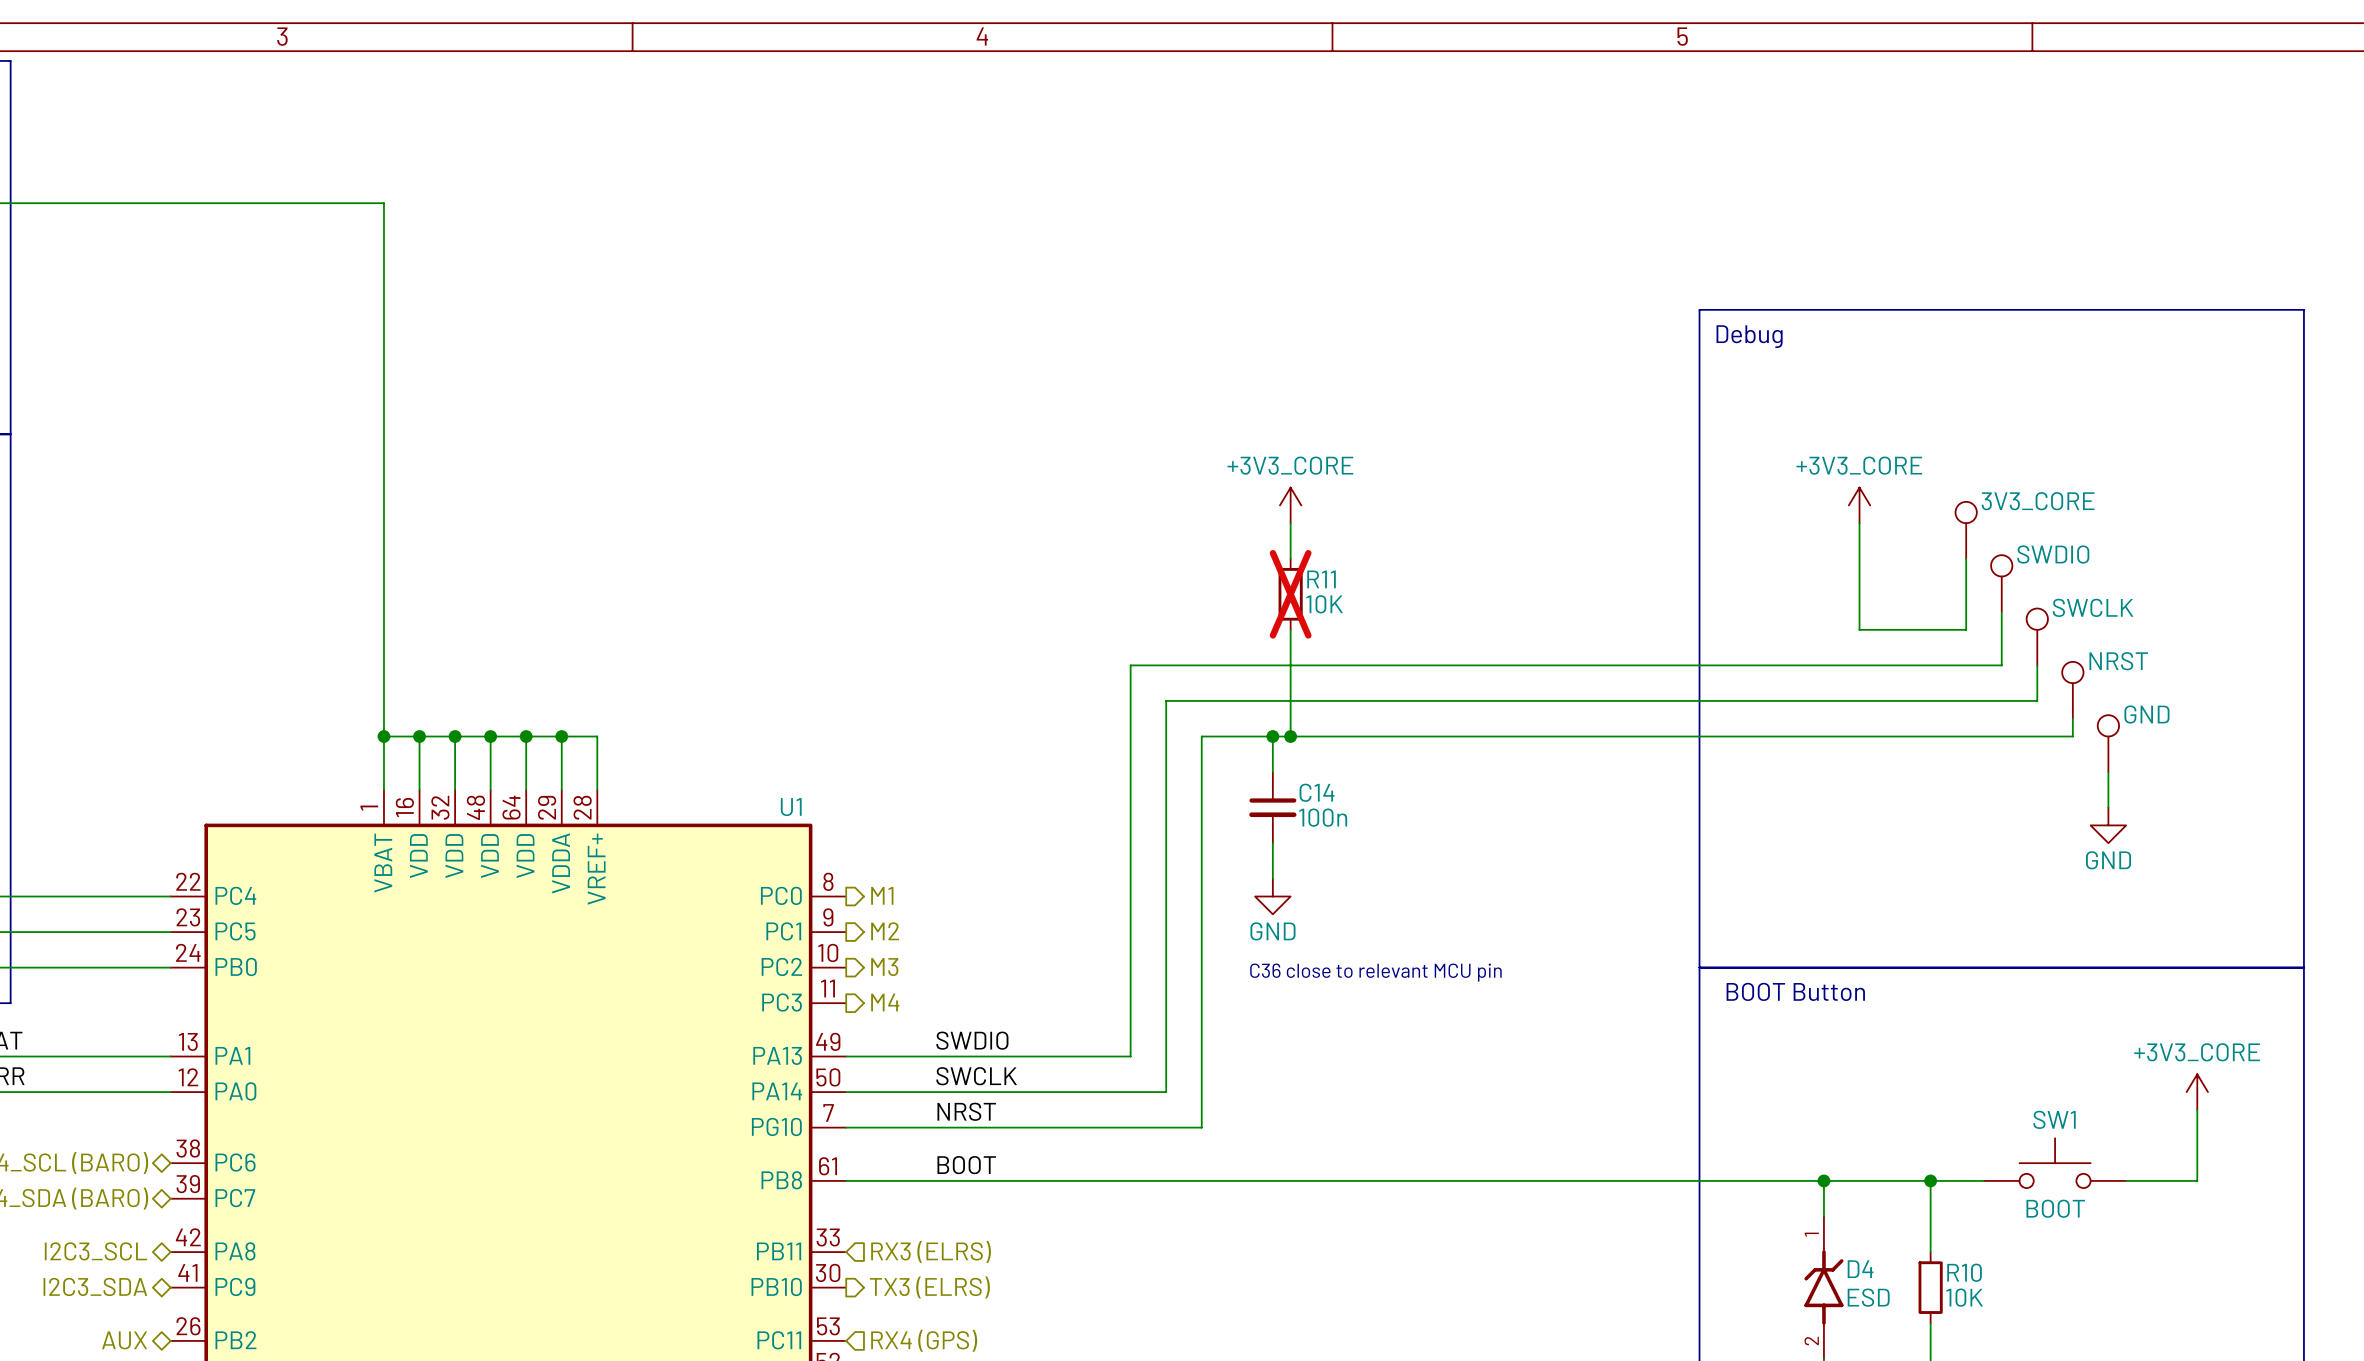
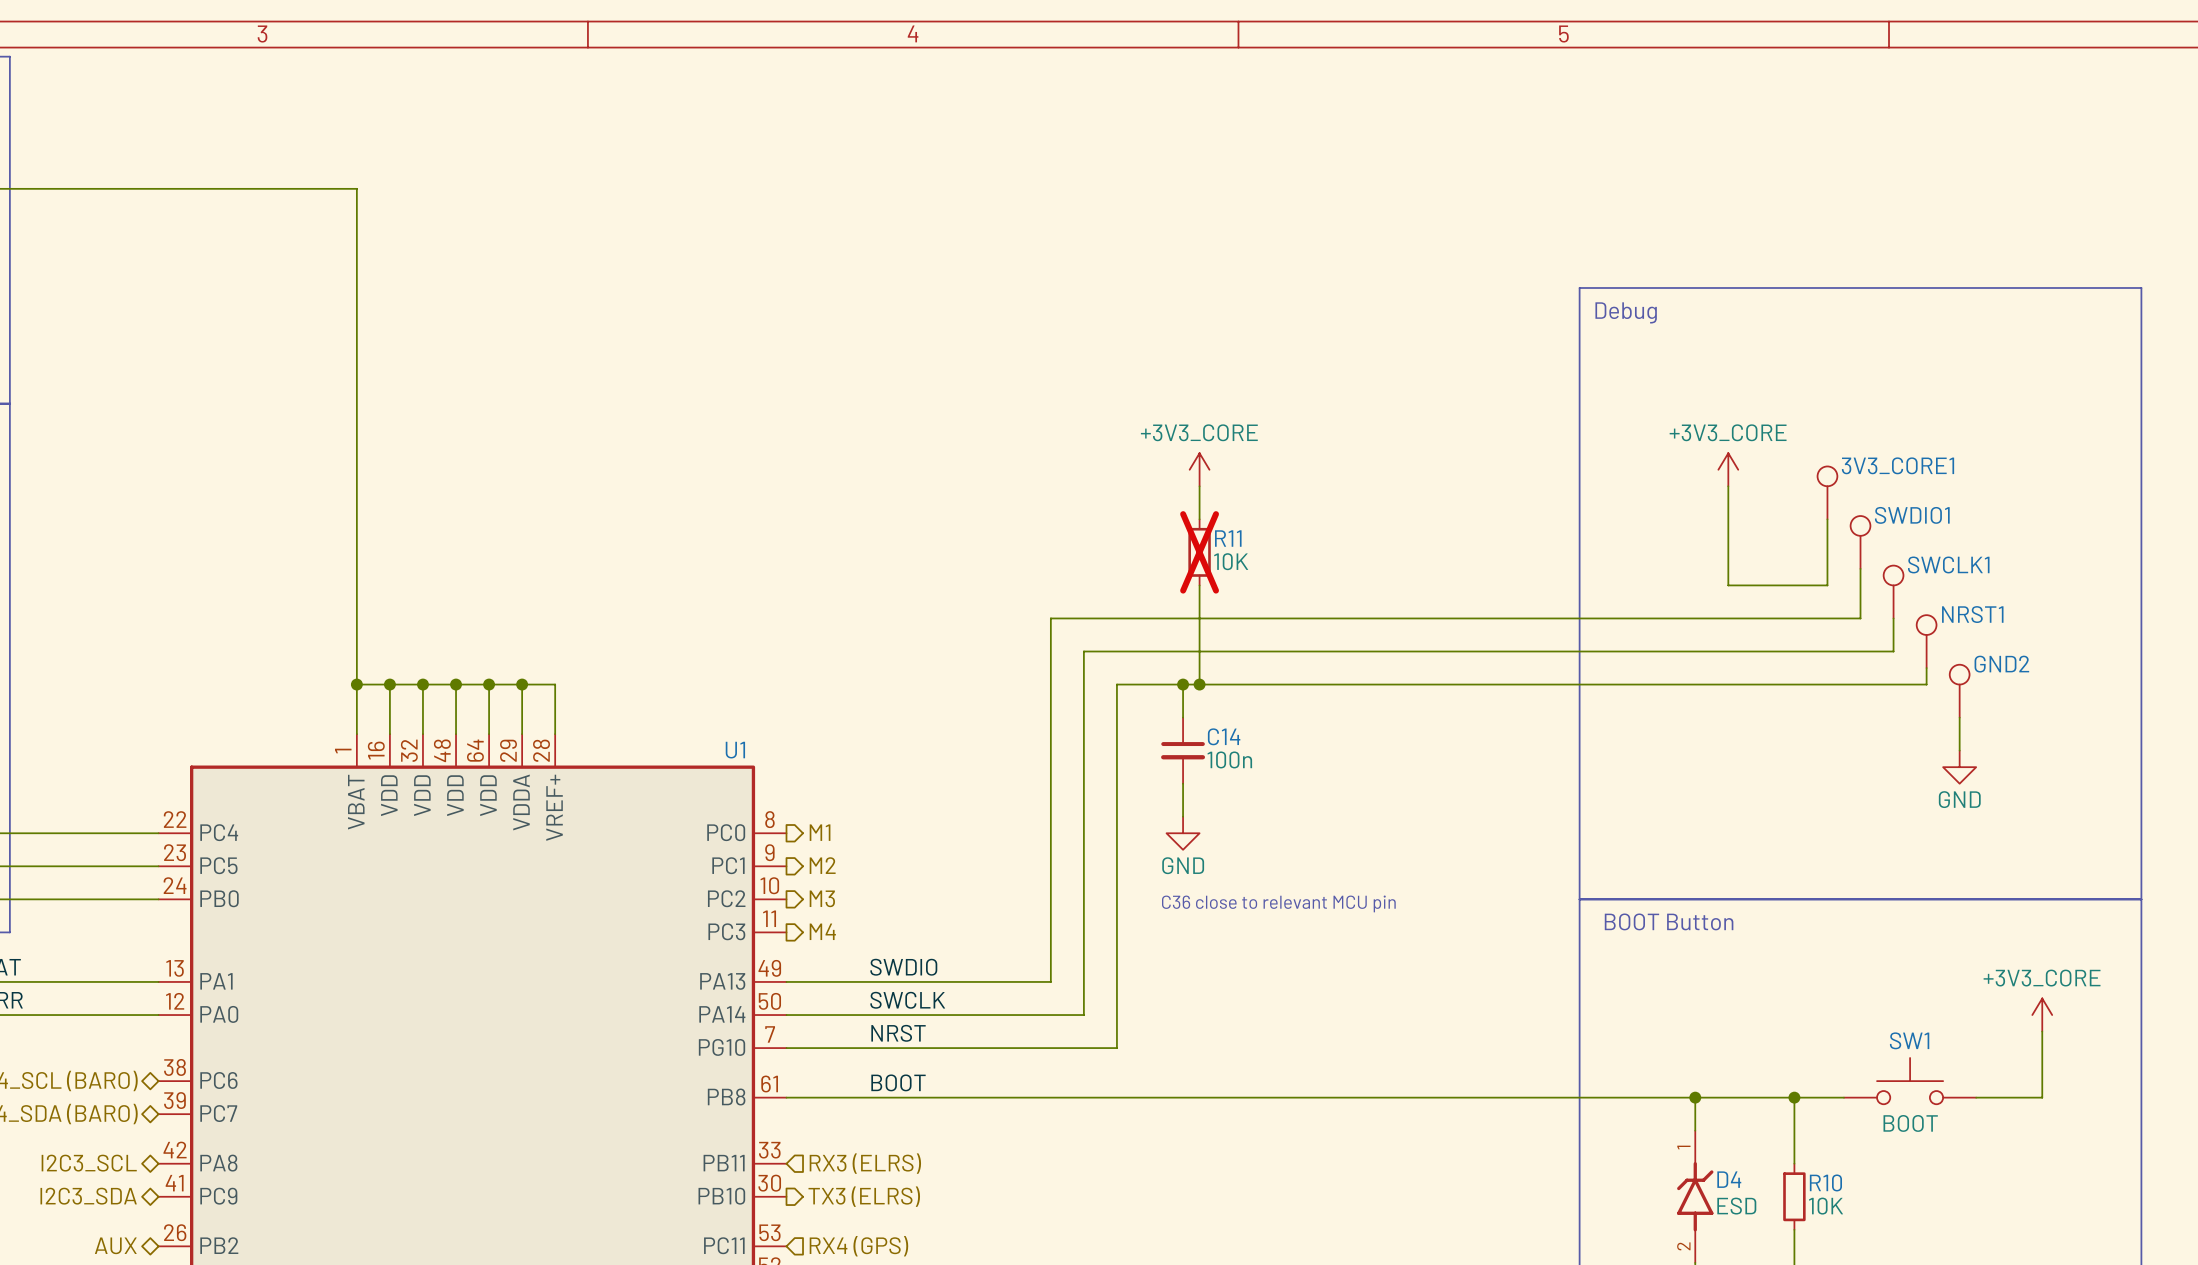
3V3_CORE name: 3V3_CORE (2038, 501) -> 3V3_CORE1 (1897, 465)
SWDIO name: SWDIO (2053, 554) -> SWDIO1 (1912, 515)
SWCLK name: SWCLK (2093, 607) -> SWCLK1 (1948, 564)
NRST name: NRST (2118, 661) -> NRST1 (1972, 614)
GND name: GND (2146, 714) -> GND2 (2001, 664)

